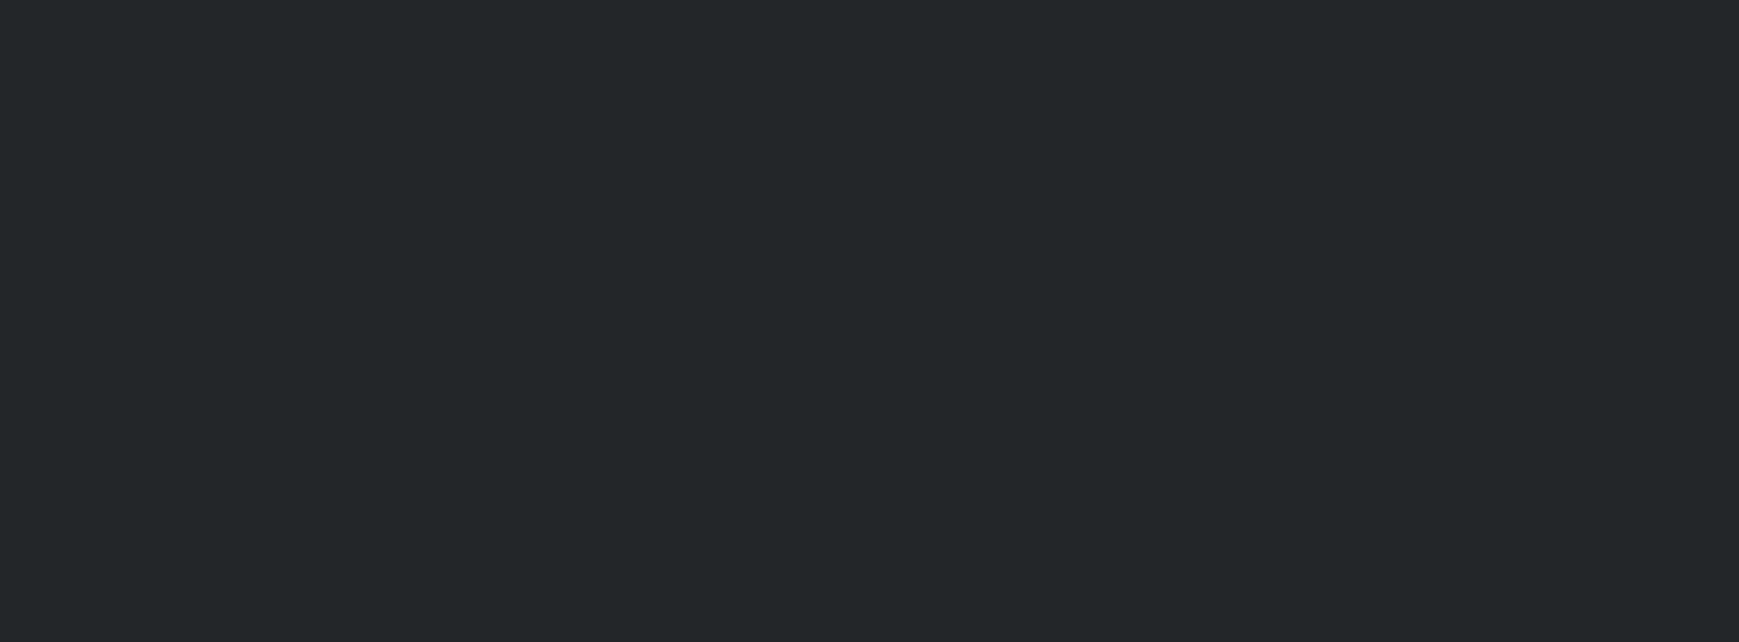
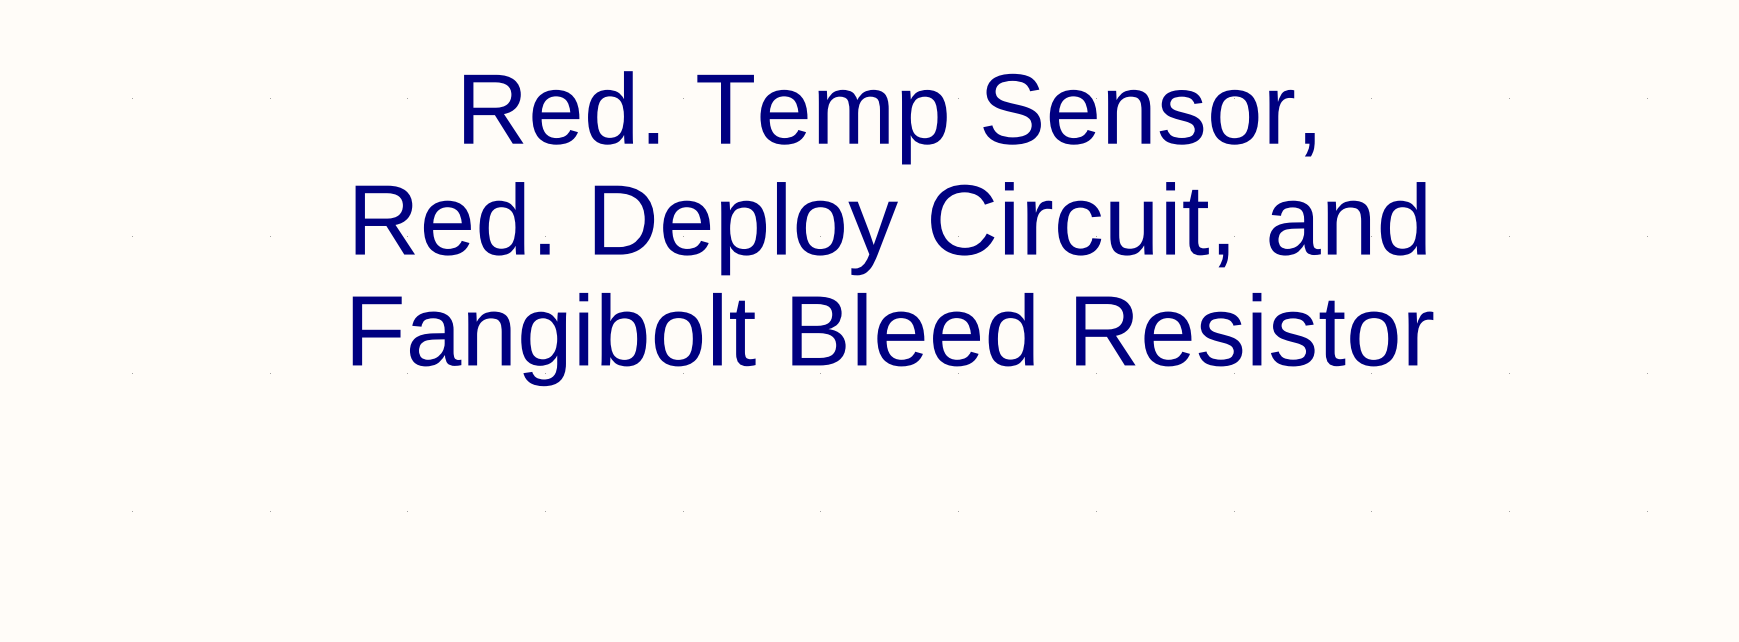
text: none -> Red. Temp Sensor, (889, 117)
text: none -> Red. Deploy Circuit, and (890, 228)
text: none -> Fangibolt Bleed Resistor (893, 339)

